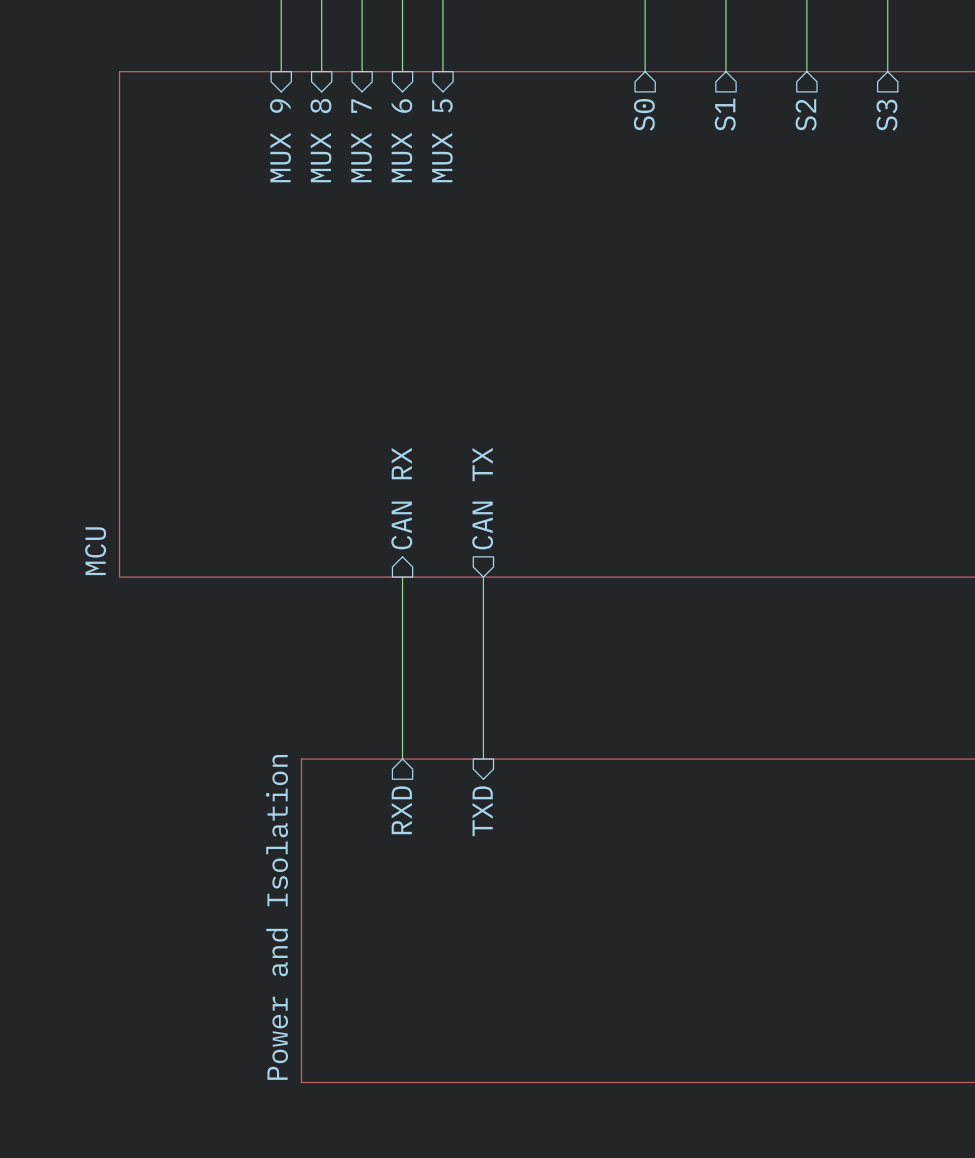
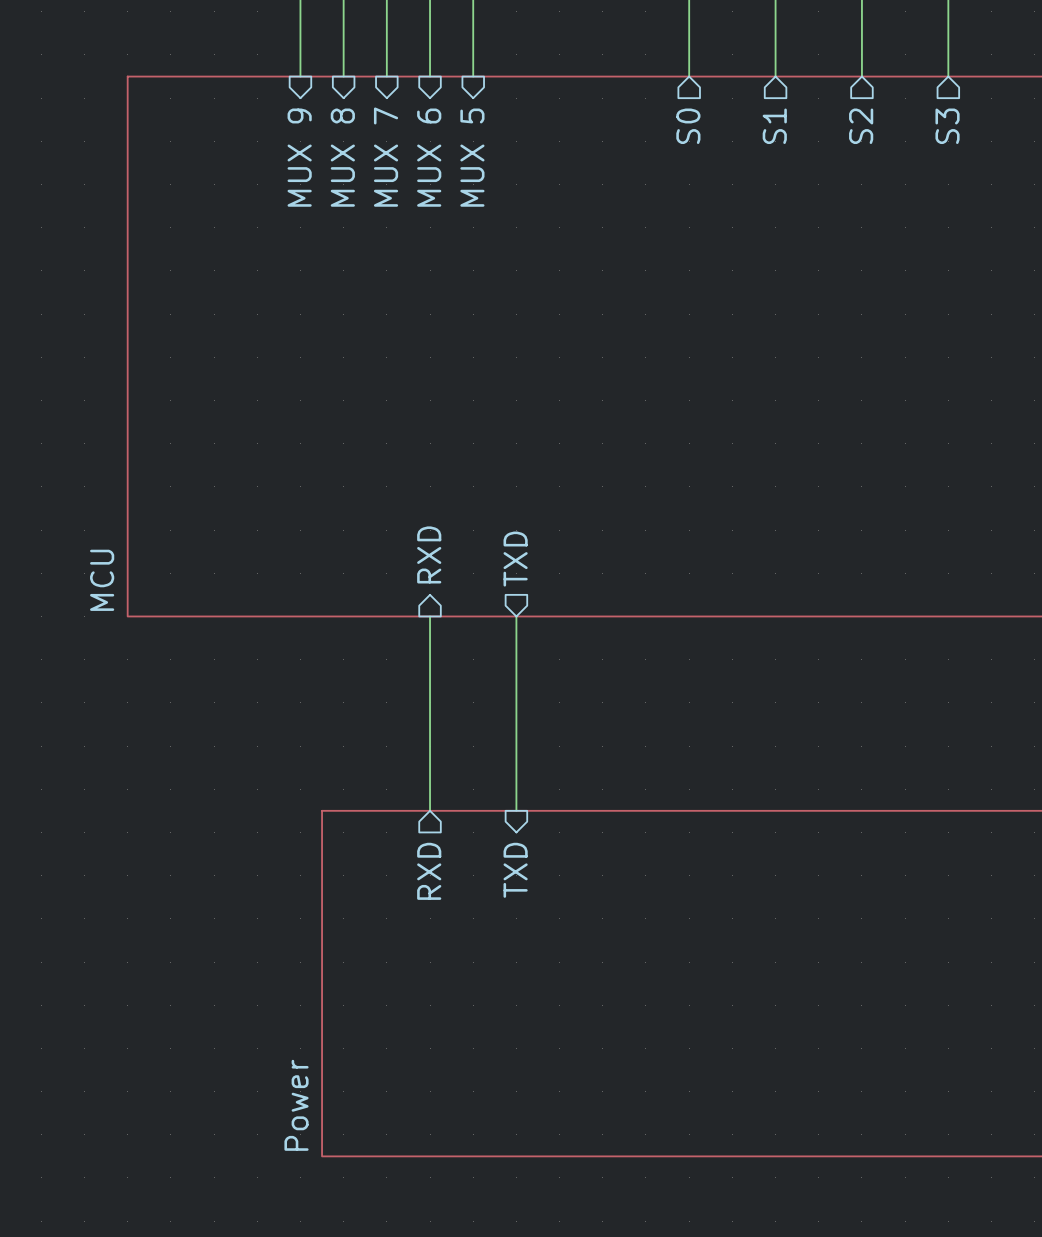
sheet pin: CAN RX (401, 498) -> RXD (429, 554)
sheet pin: CAN TX (482, 498) -> TXD (515, 559)
sheet Power and Isolation name: Power and Isolation (277, 917) -> Power (296, 1105)

